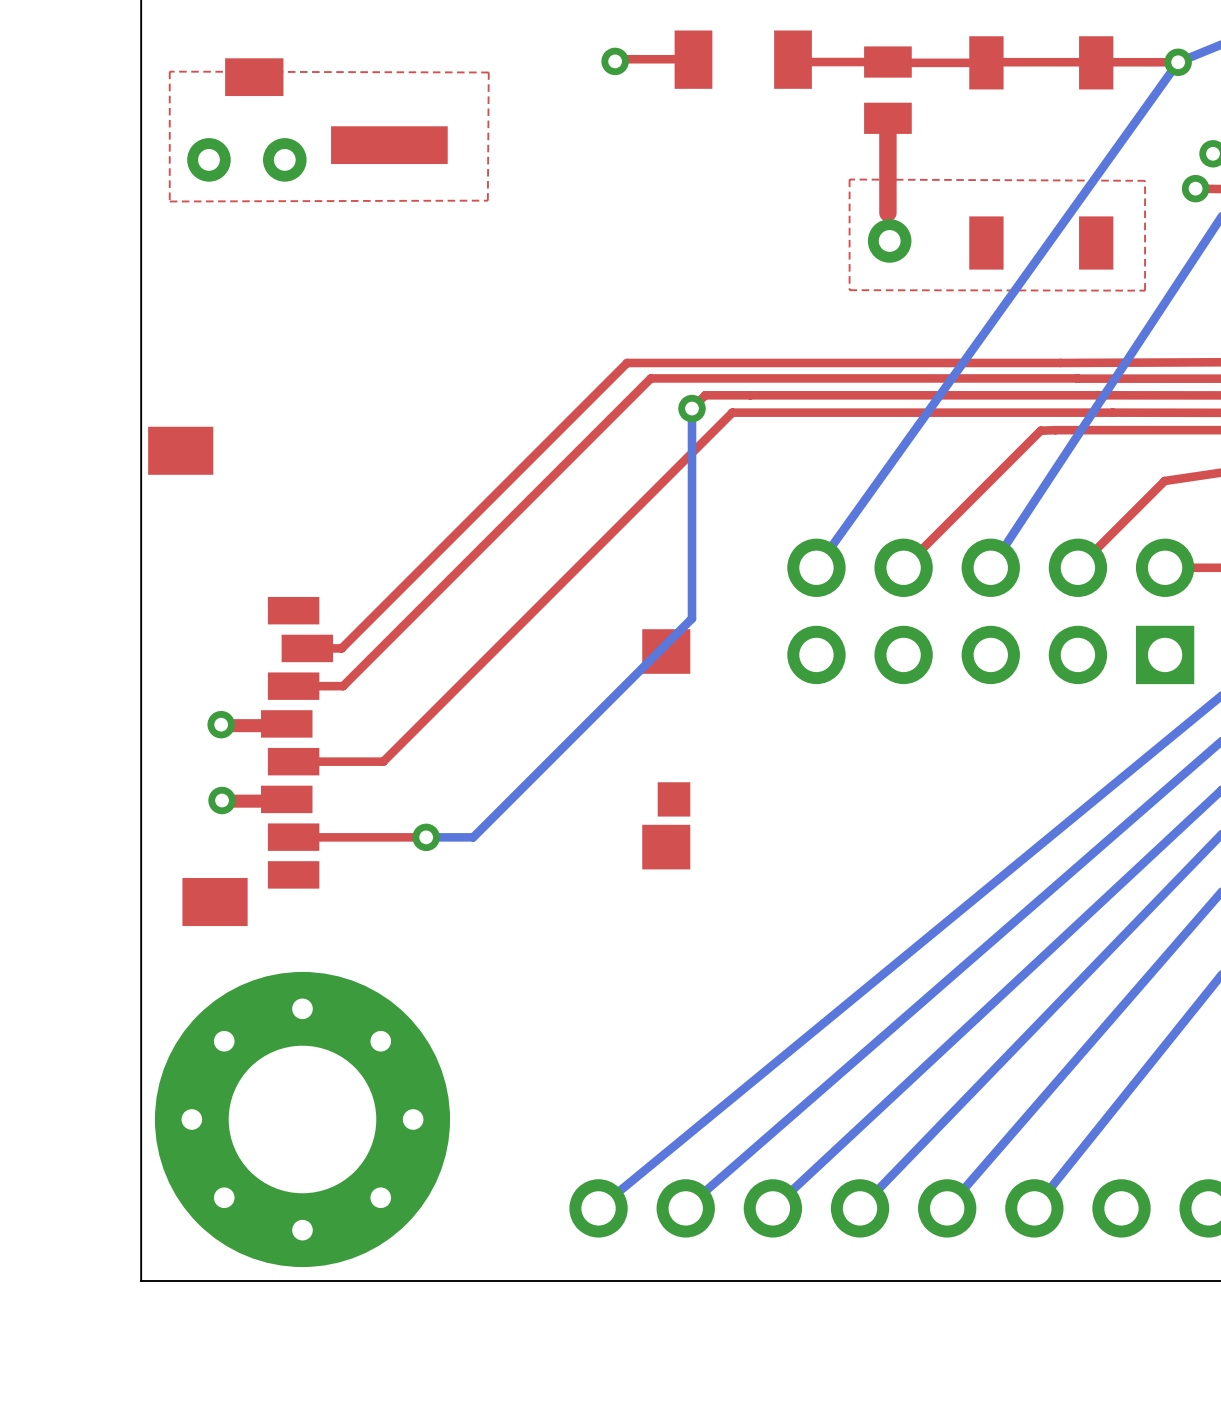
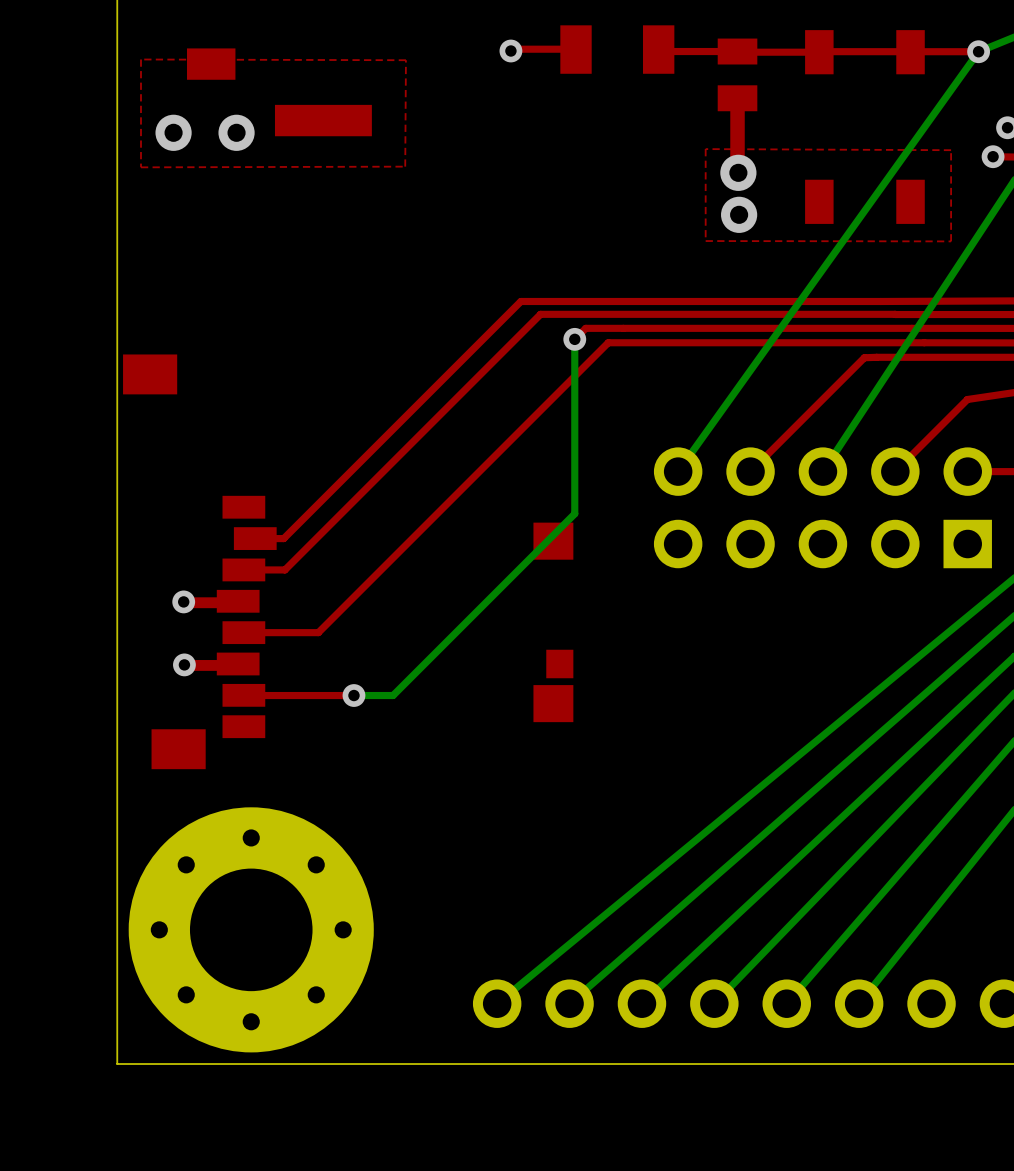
via: none -> (738, 172)
via: (889, 240) -> none
via: none -> (739, 214)

